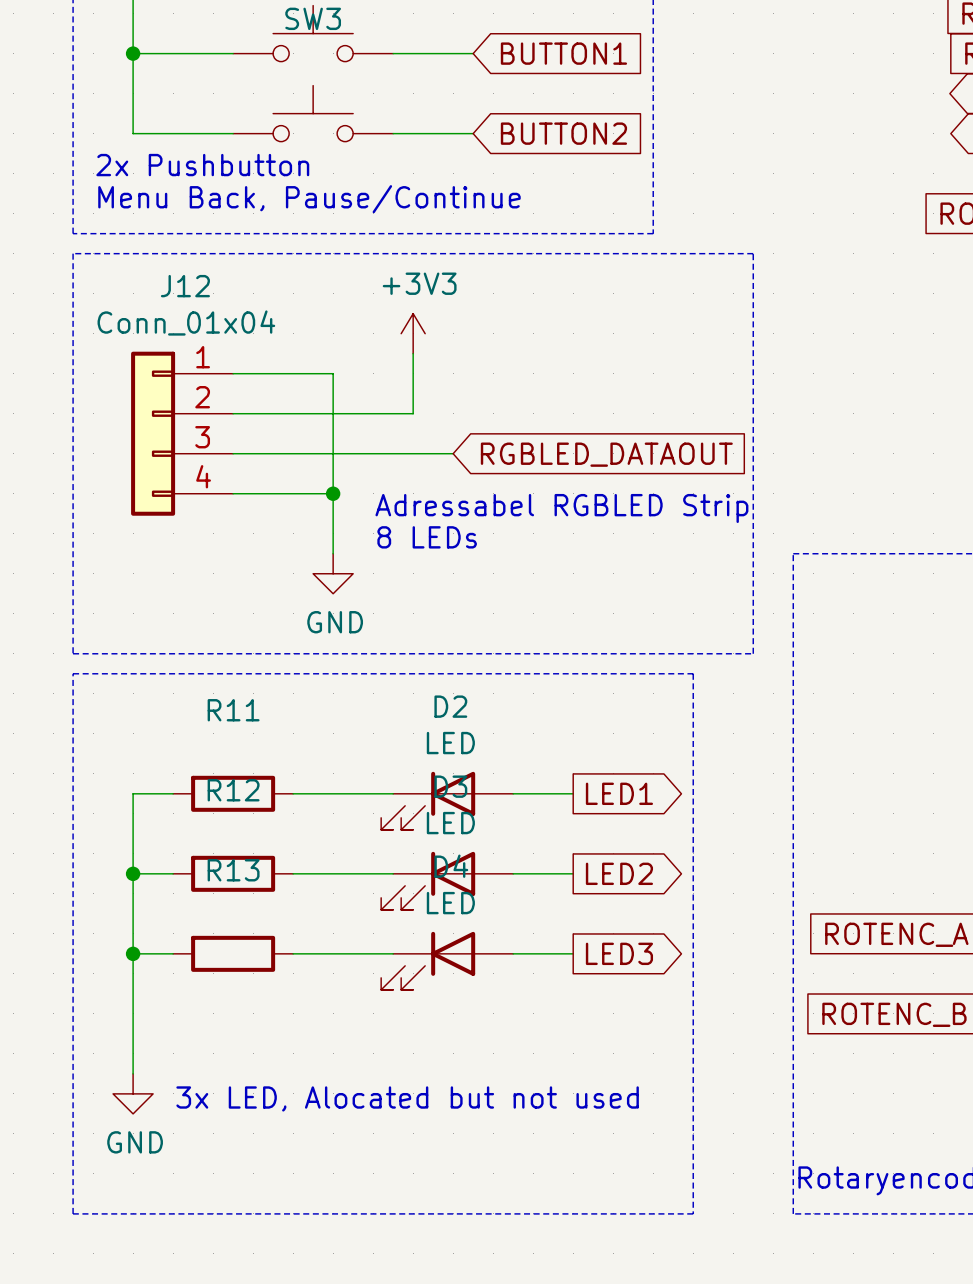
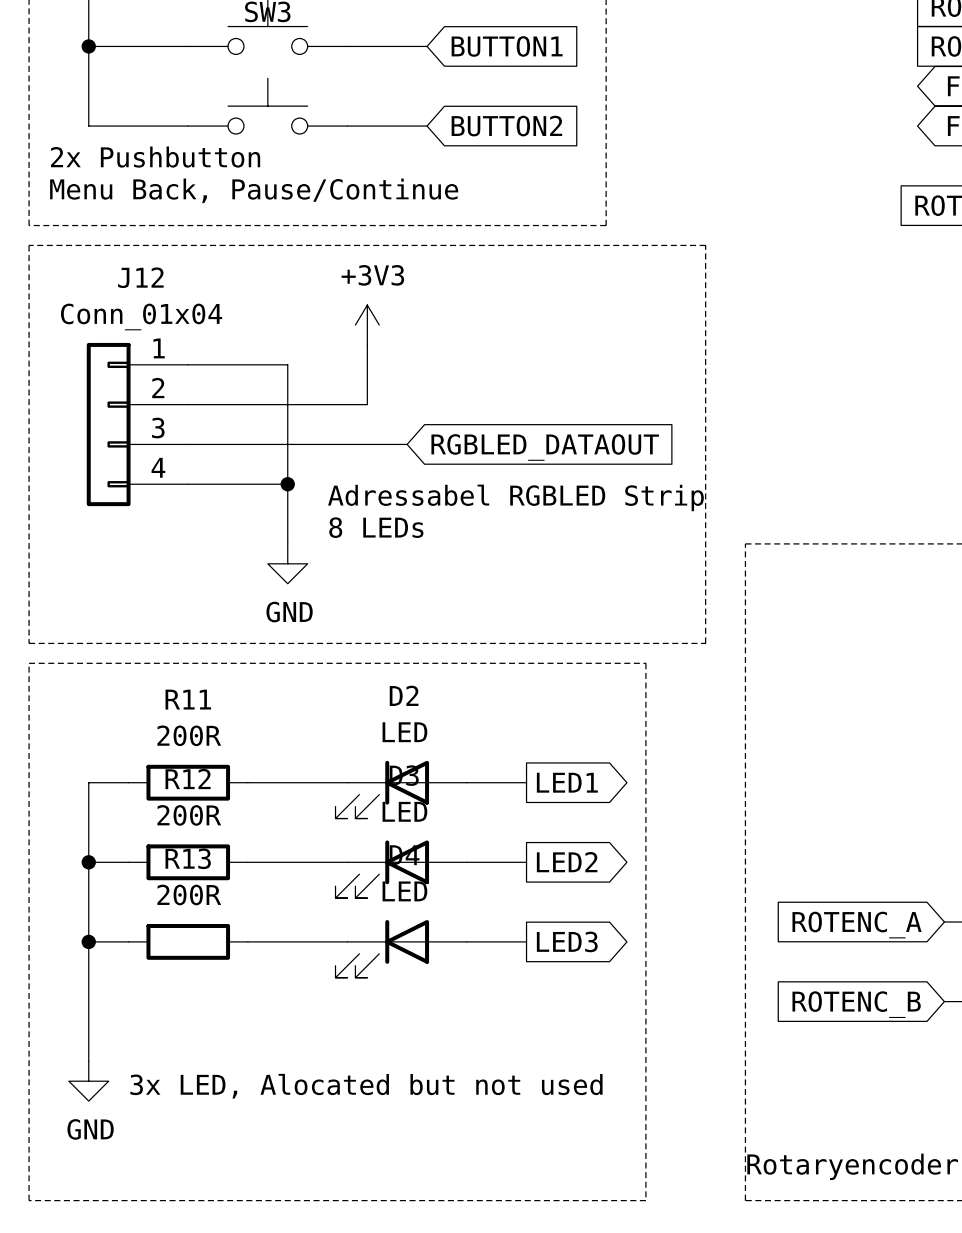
R11 value: none -> 200R (189, 735)
R12 value: none -> 200R (189, 815)
R13 value: none -> 200R (189, 895)

